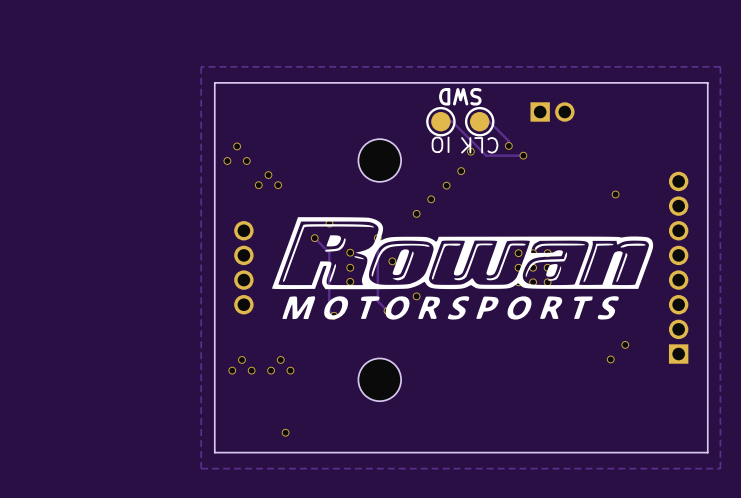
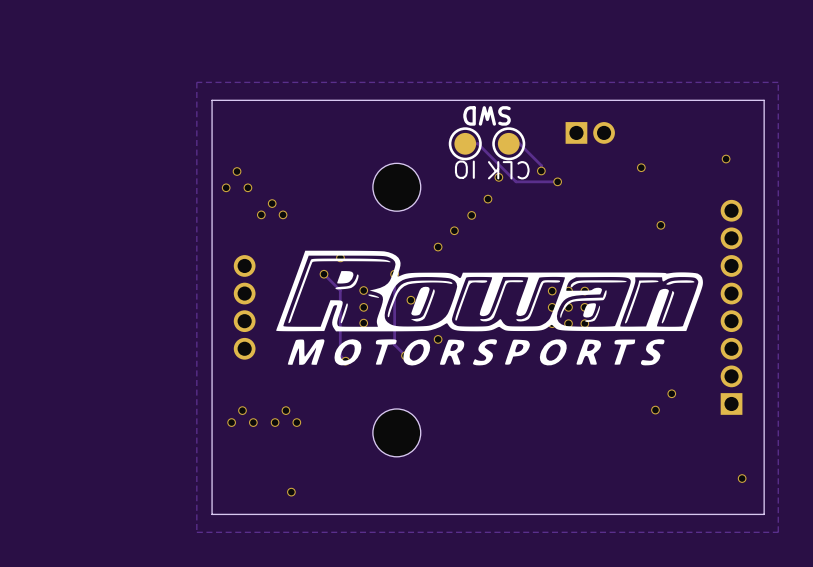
via: none -> (726, 159)
via: none -> (641, 167)
via: none -> (742, 478)

